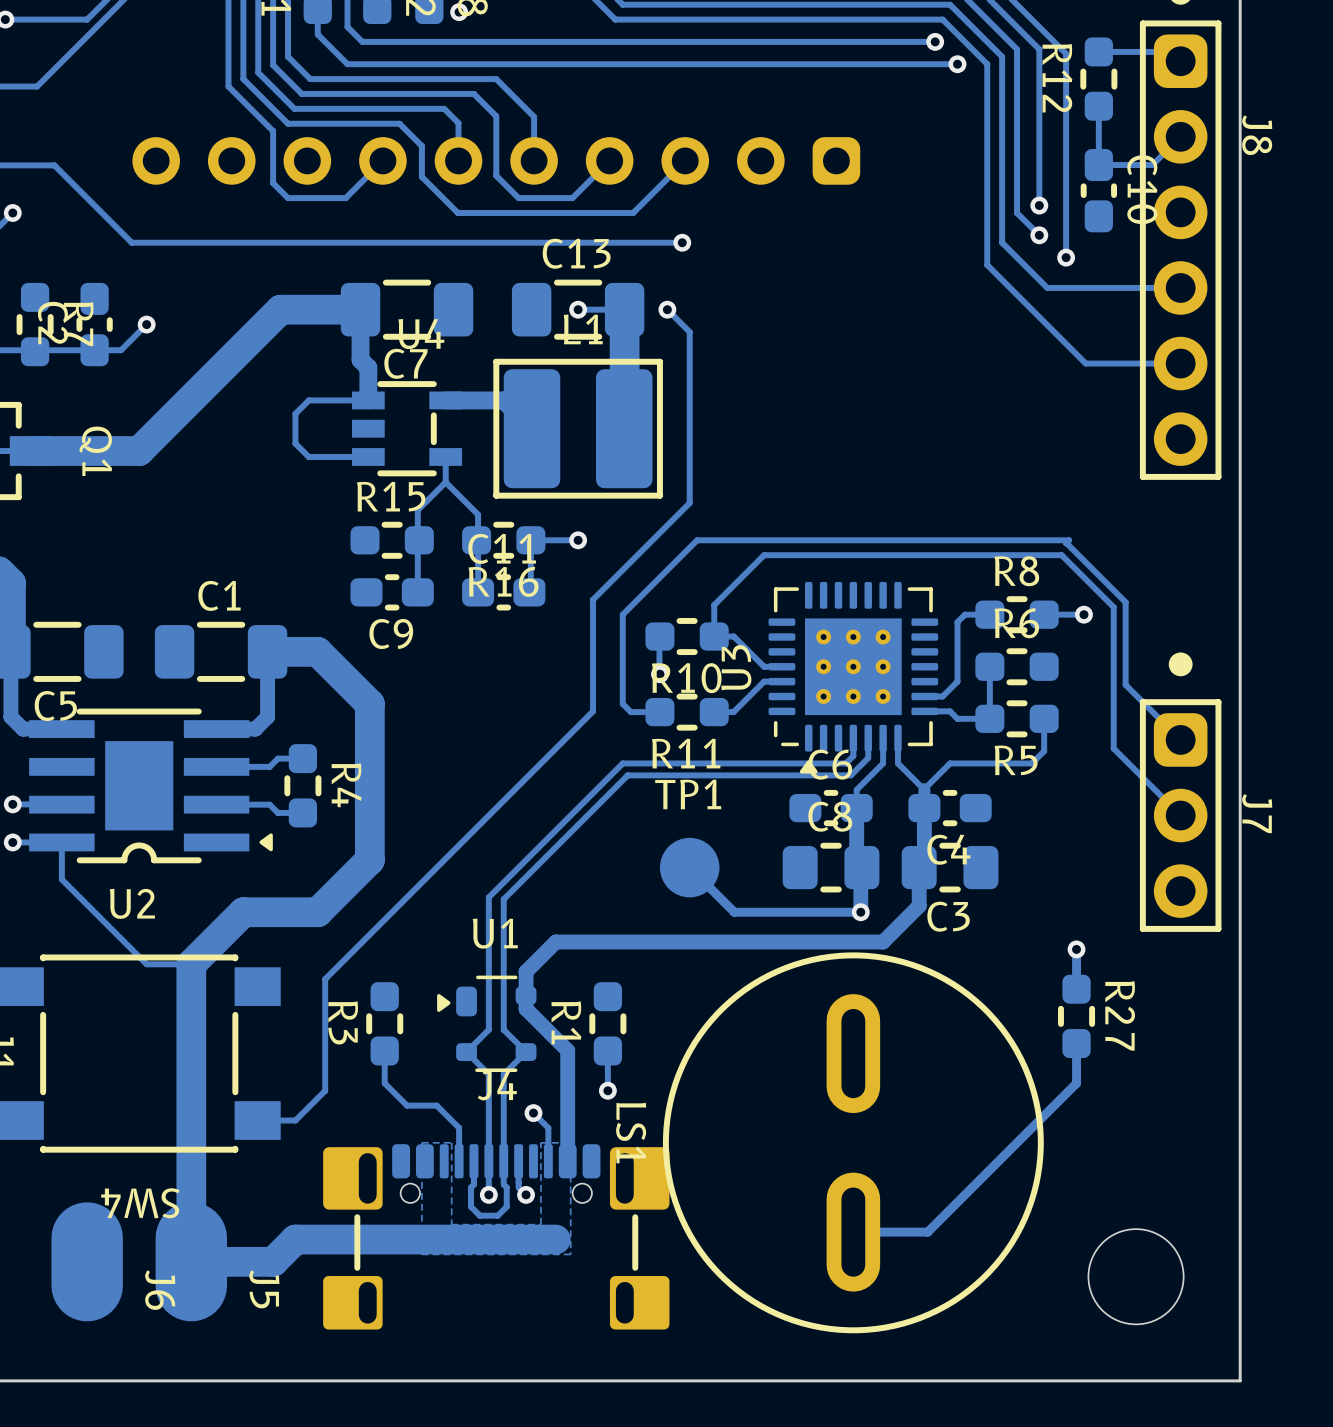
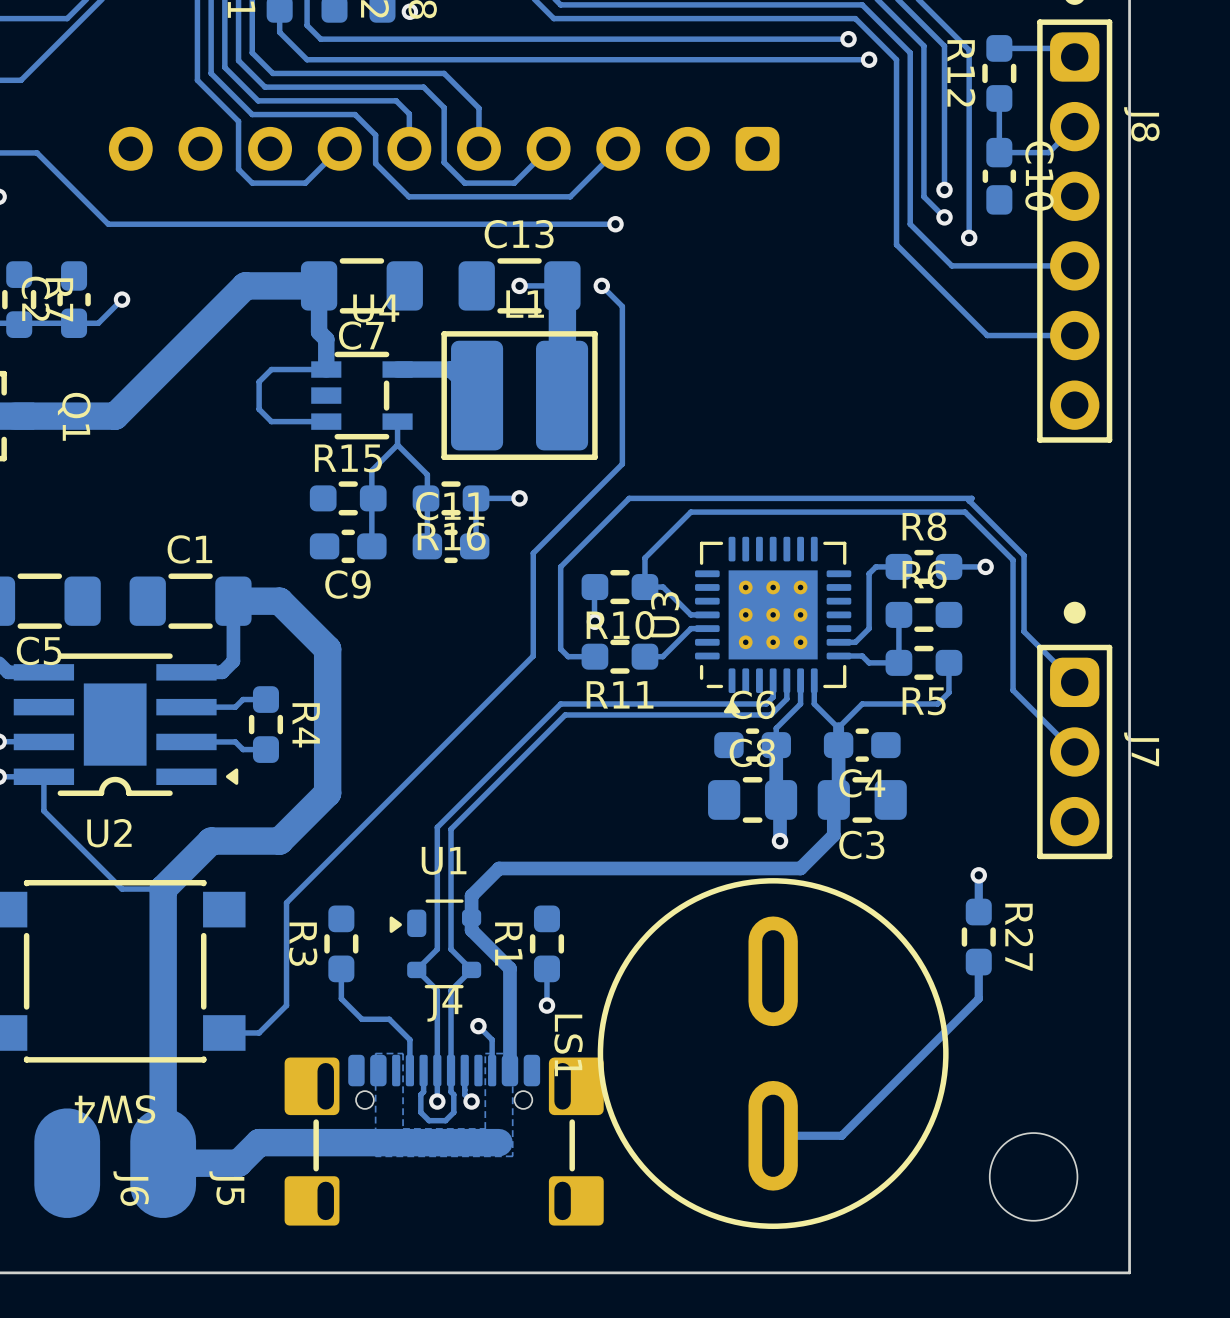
track: (689, 867) (734, 912) (860, 912) -> none
TP1: (689, 867) -> none

